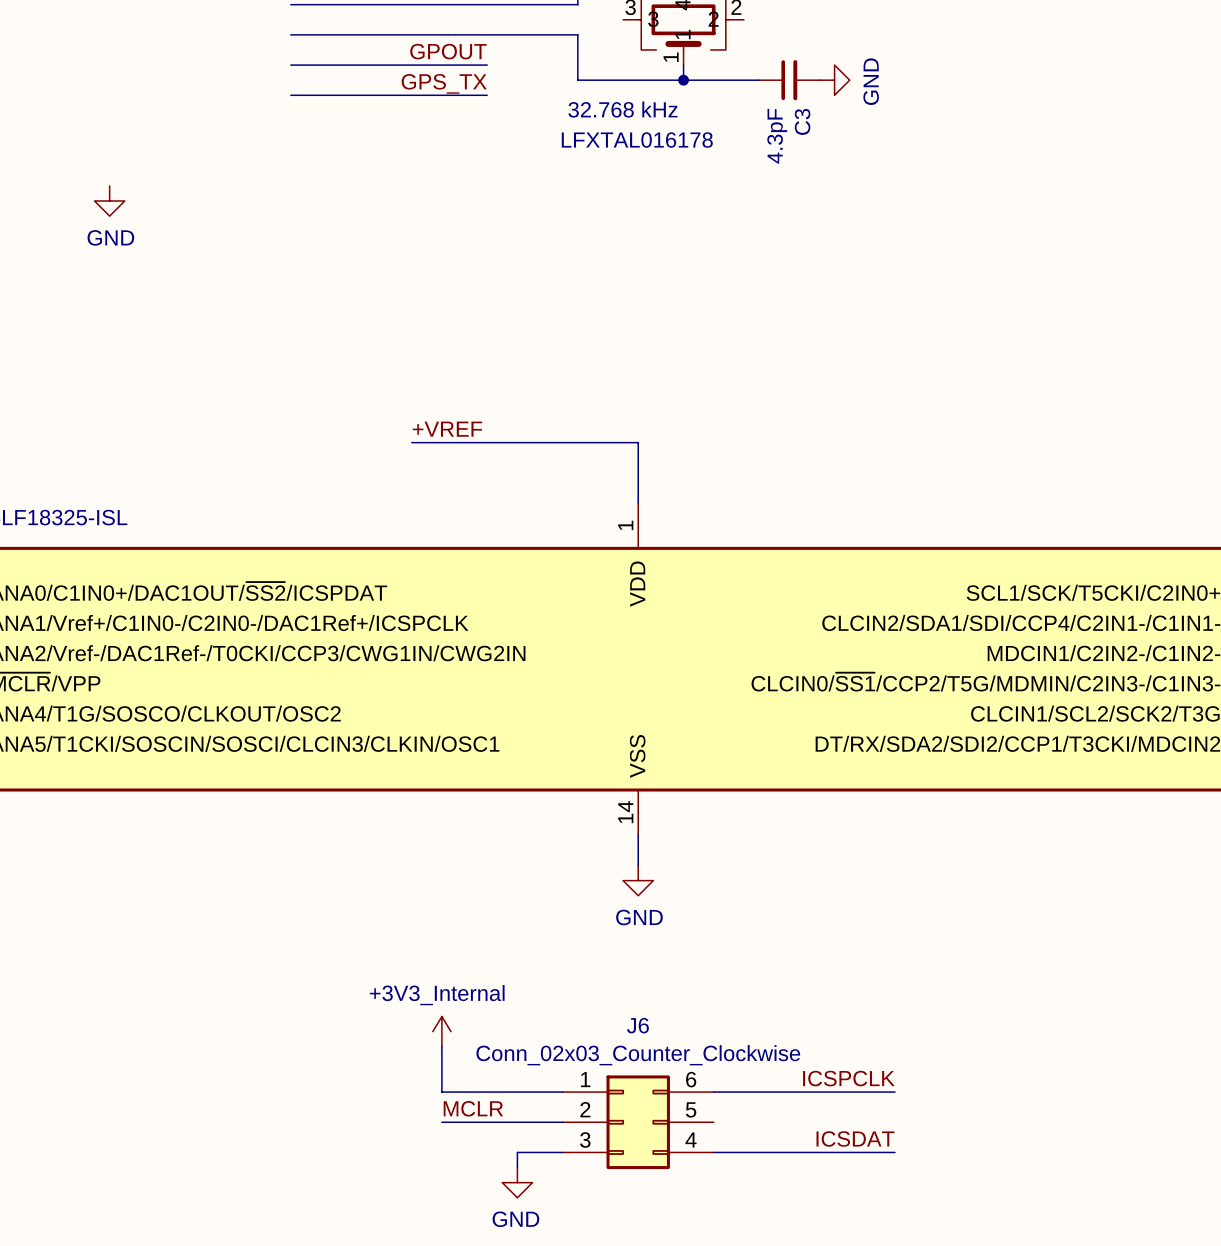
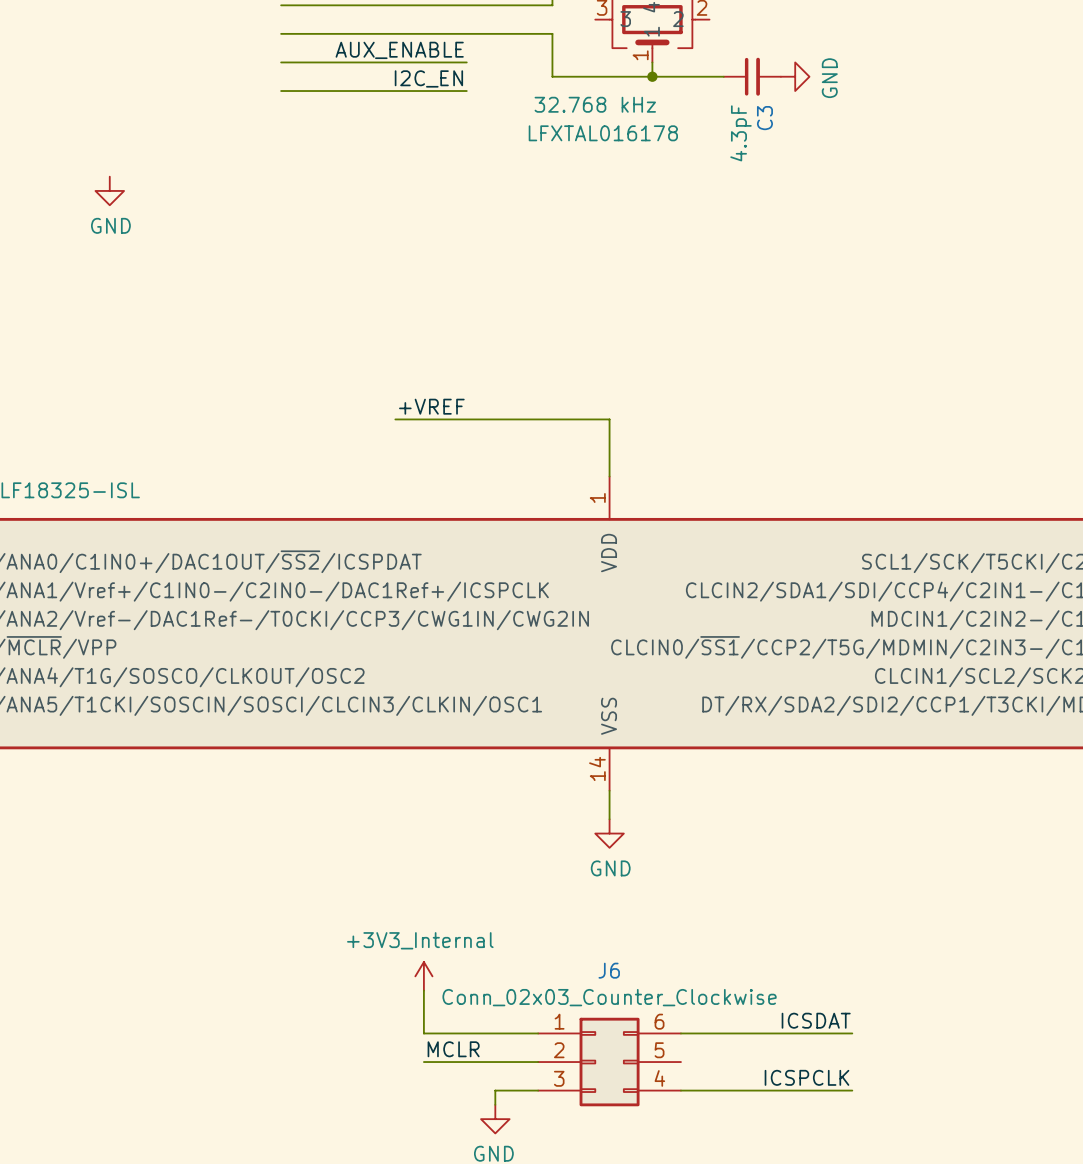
label: GPOUT (448, 51) -> AUX_ENABLE (399, 50)
label: GPS_TX (444, 83) -> I2C_EN (428, 78)
label: ICSPCLK (848, 1078) -> ICSDAT (816, 1020)
label: ICSDAT (855, 1138) -> ICSPCLK (806, 1077)

